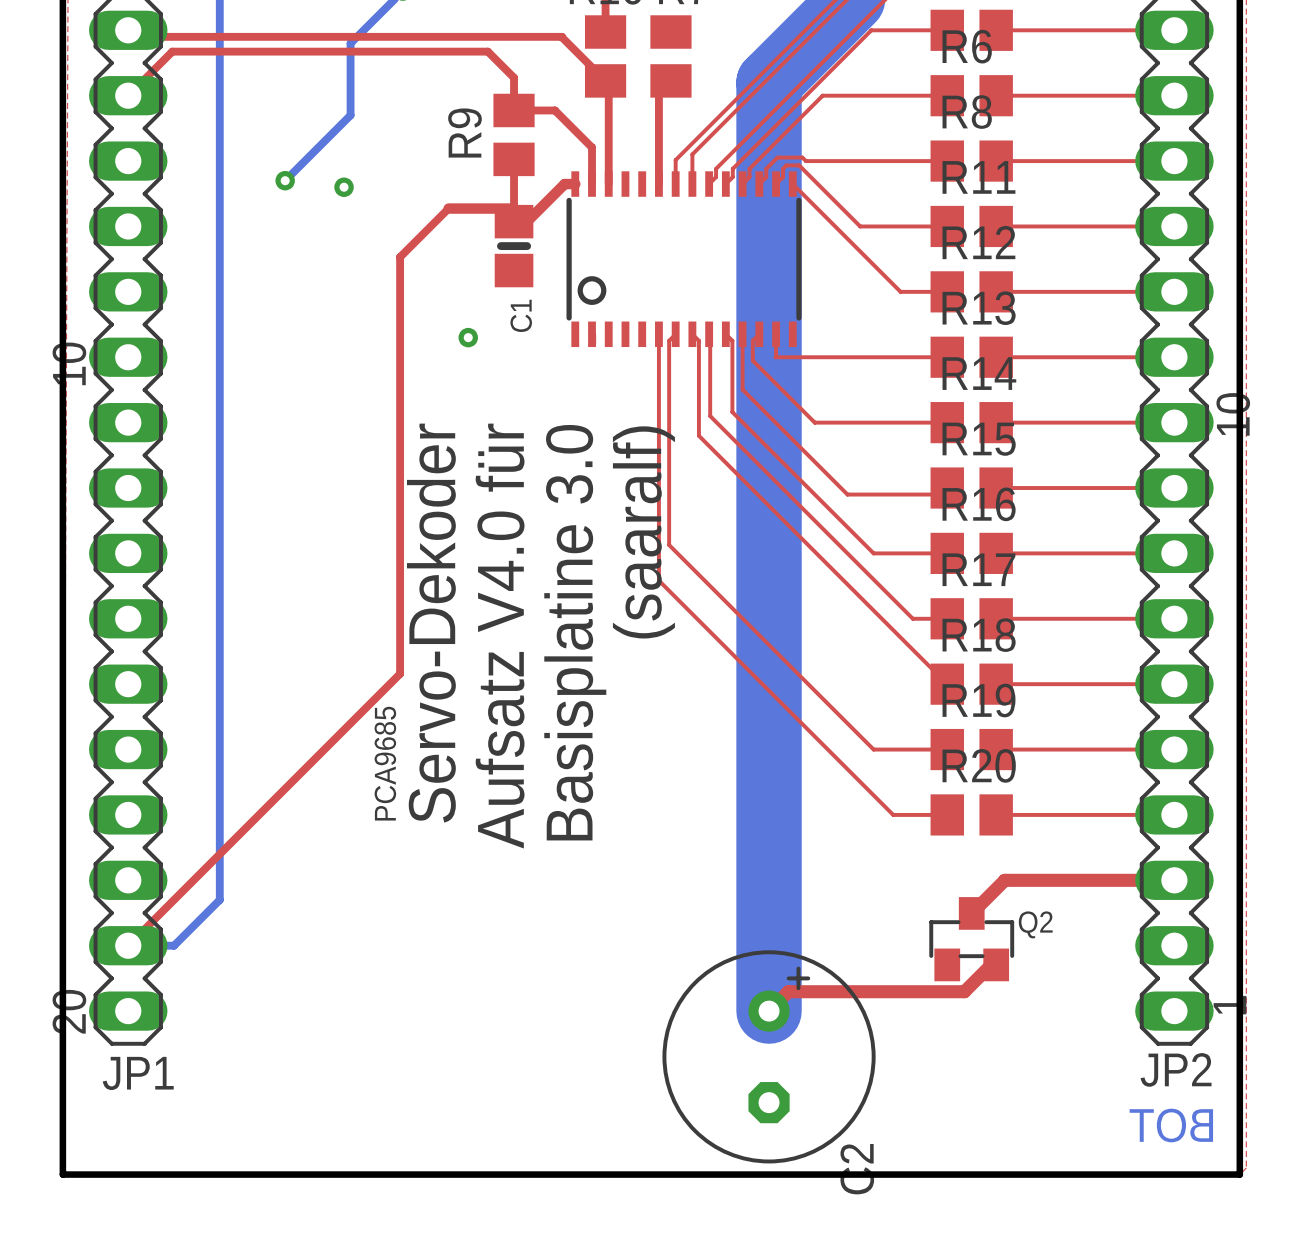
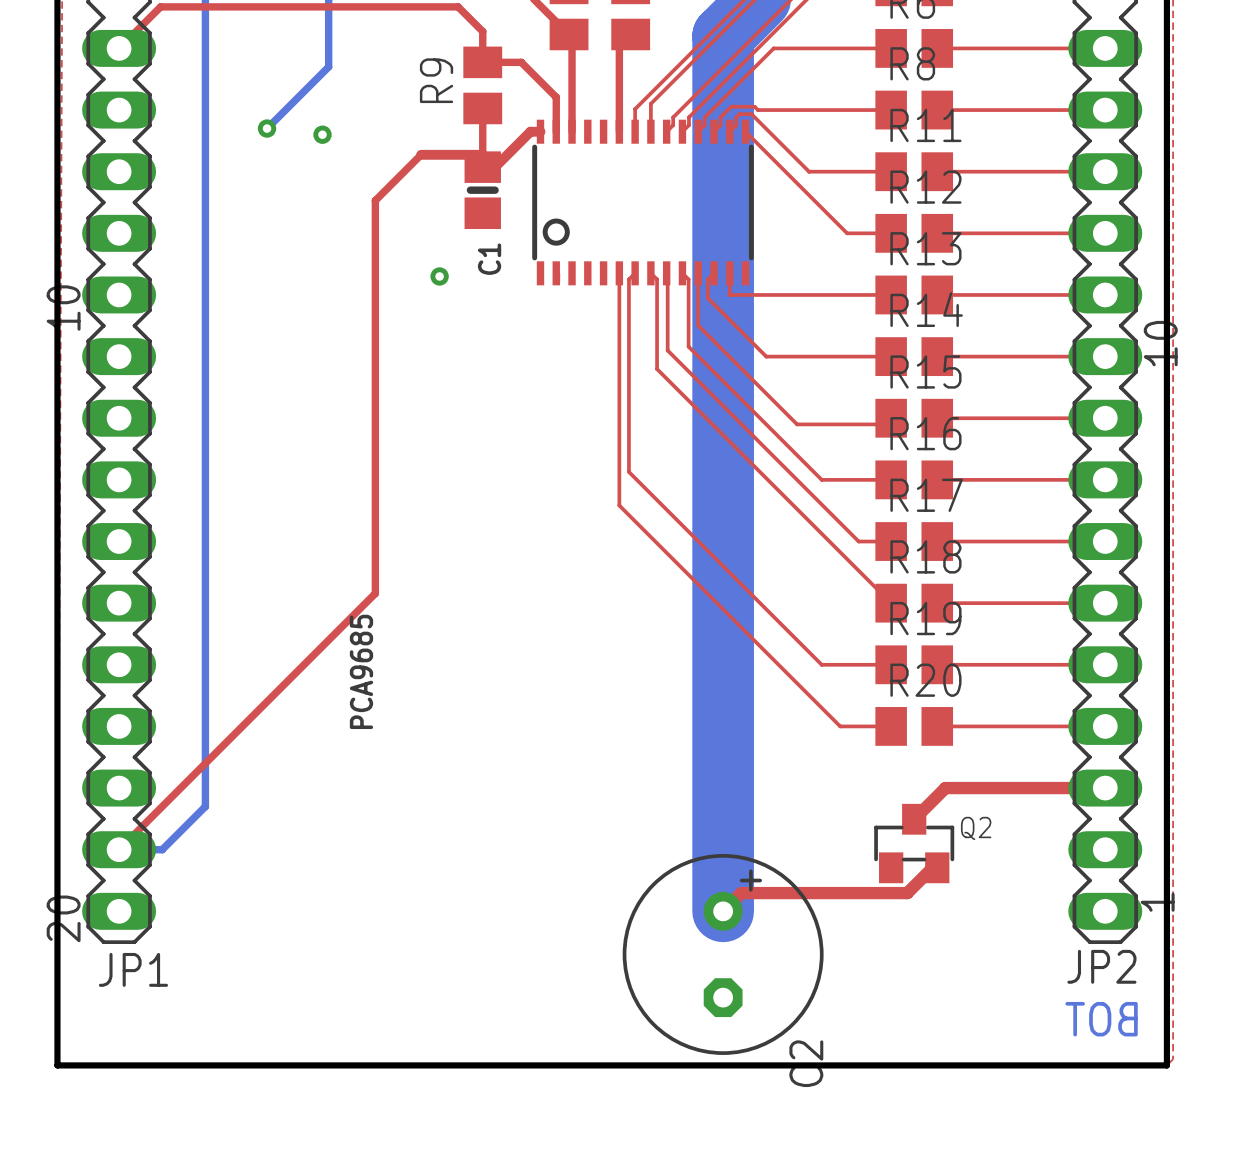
text: (saaralf) (643, 532) -> none
text: Servo-Dekoder (431, 623) -> none
text: Basisplatine 3.0 (575, 632) -> none
text: Aufsatz V4.0 für (500, 636) -> none

